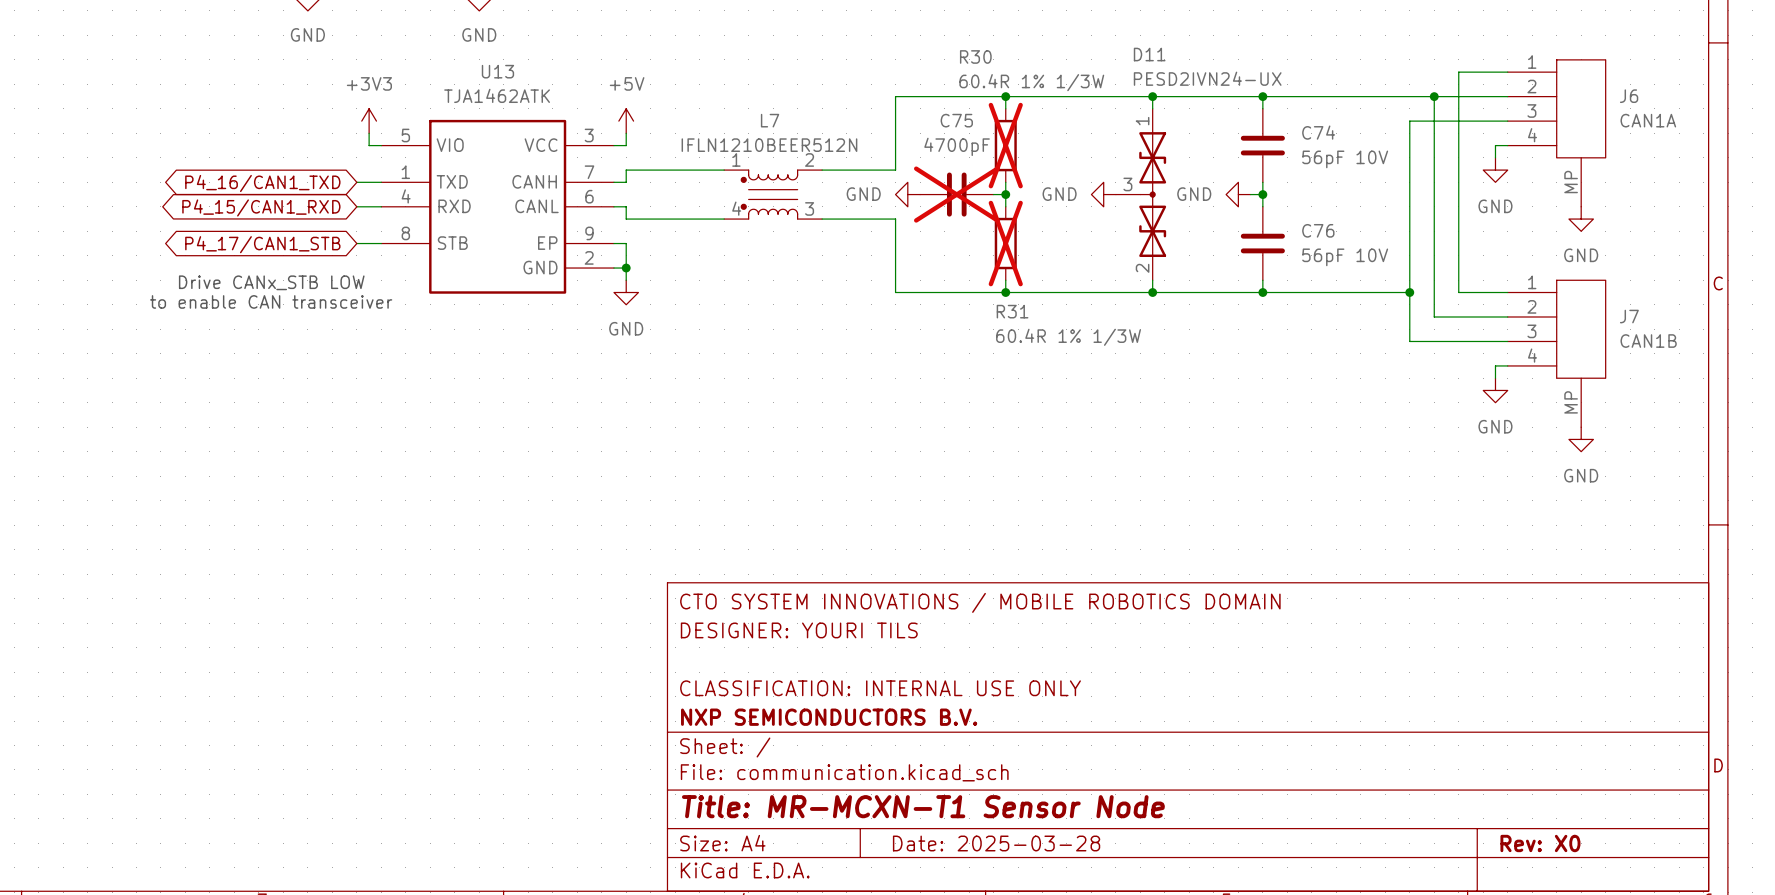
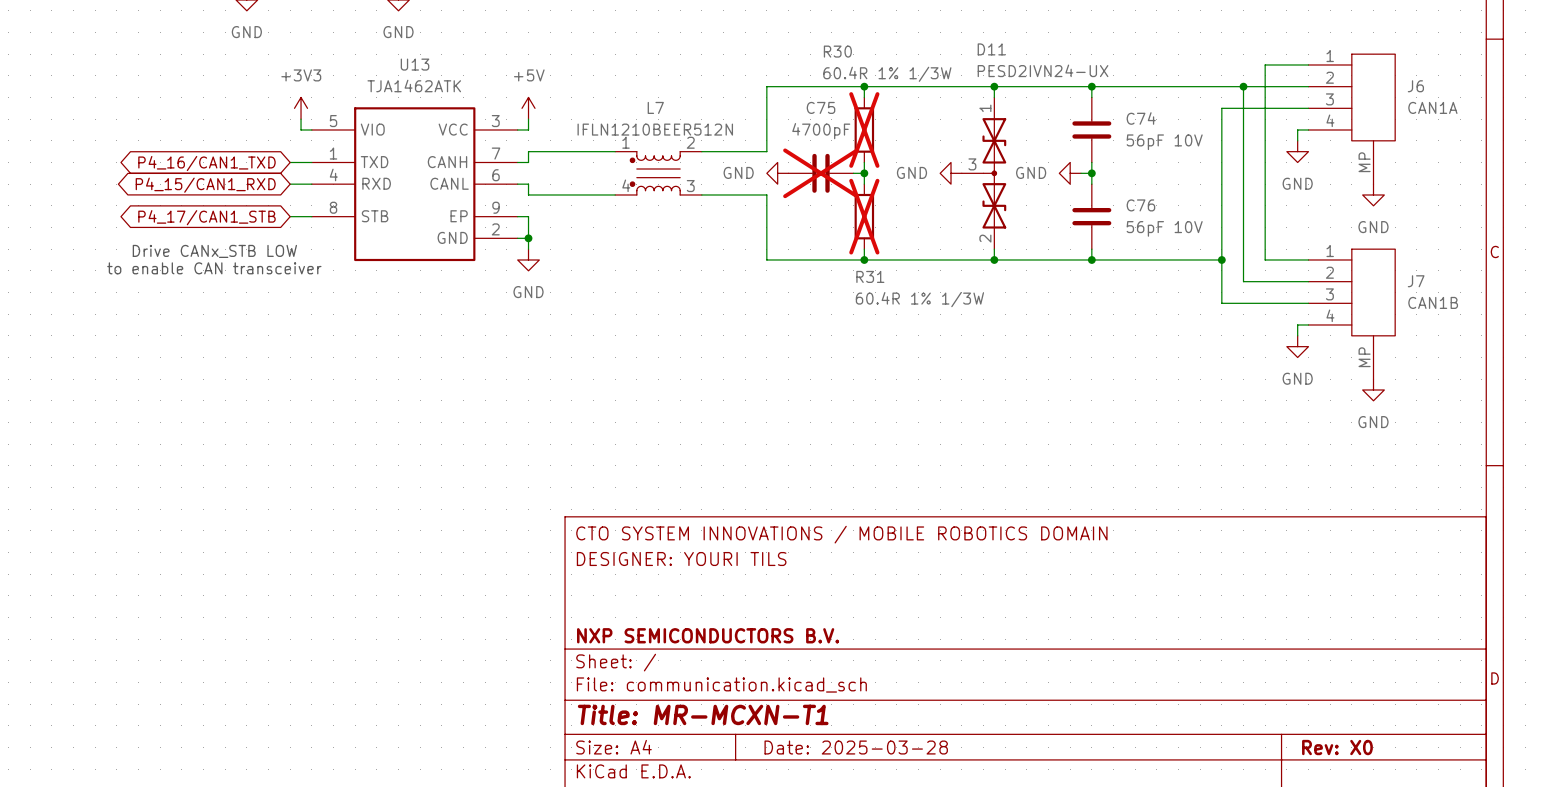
title block: CLASSIFICATION: INTERNAL USE ONLY (880, 688) -> none
title block: Title: MR-MCXN-T1 Sensor Node (923, 806) -> Title: MR-MCXN-T1 (703, 714)

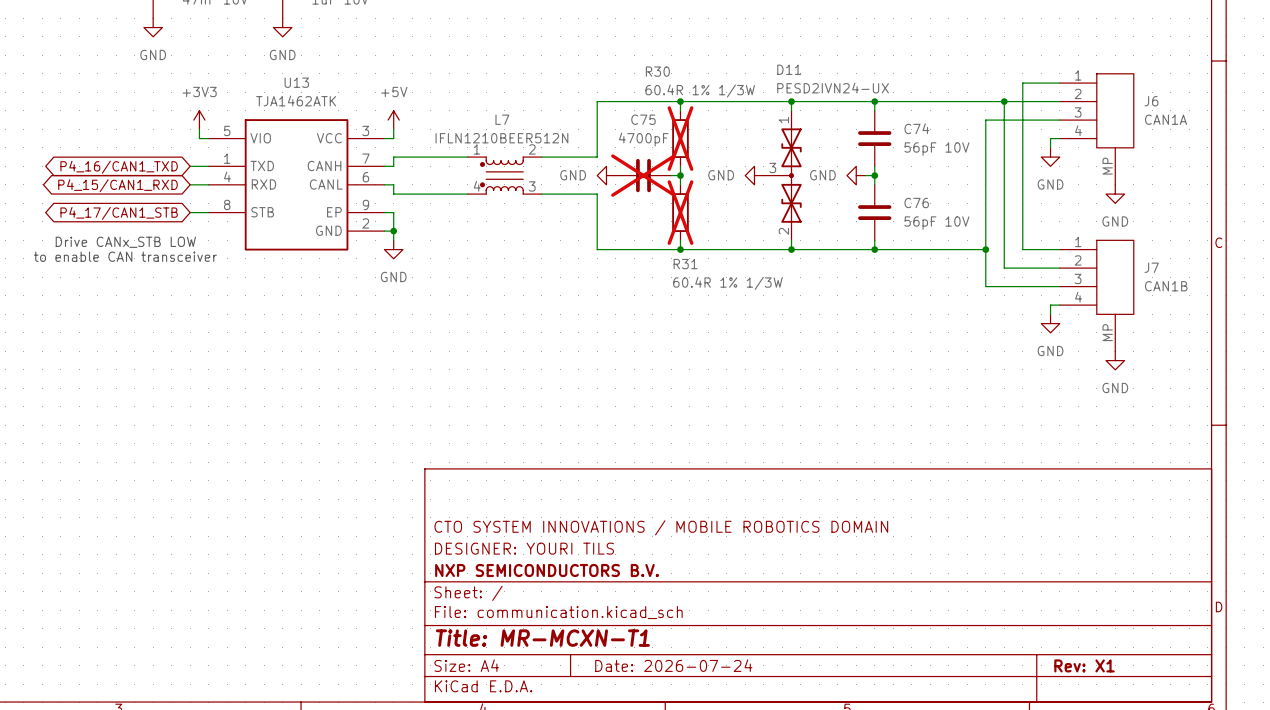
title block position: CTO SYSTEM INNOVATIONS / MOBILE ROBOTICS DOMAIN (841, 534) -> CTO SYSTEM INNOVATIONS / MOBILE ROBOTICS DOMAIN (661, 527)
title block position: DESIGNER: YOURI TILS (681, 559) -> DESIGNER: YOURI TILS (524, 548)
title block: Date: 2025-03-28 (856, 747) -> Date: 2026-07-24 (673, 665)
title block: Rev: X0 (1337, 747) -> Rev: X1 (1084, 665)

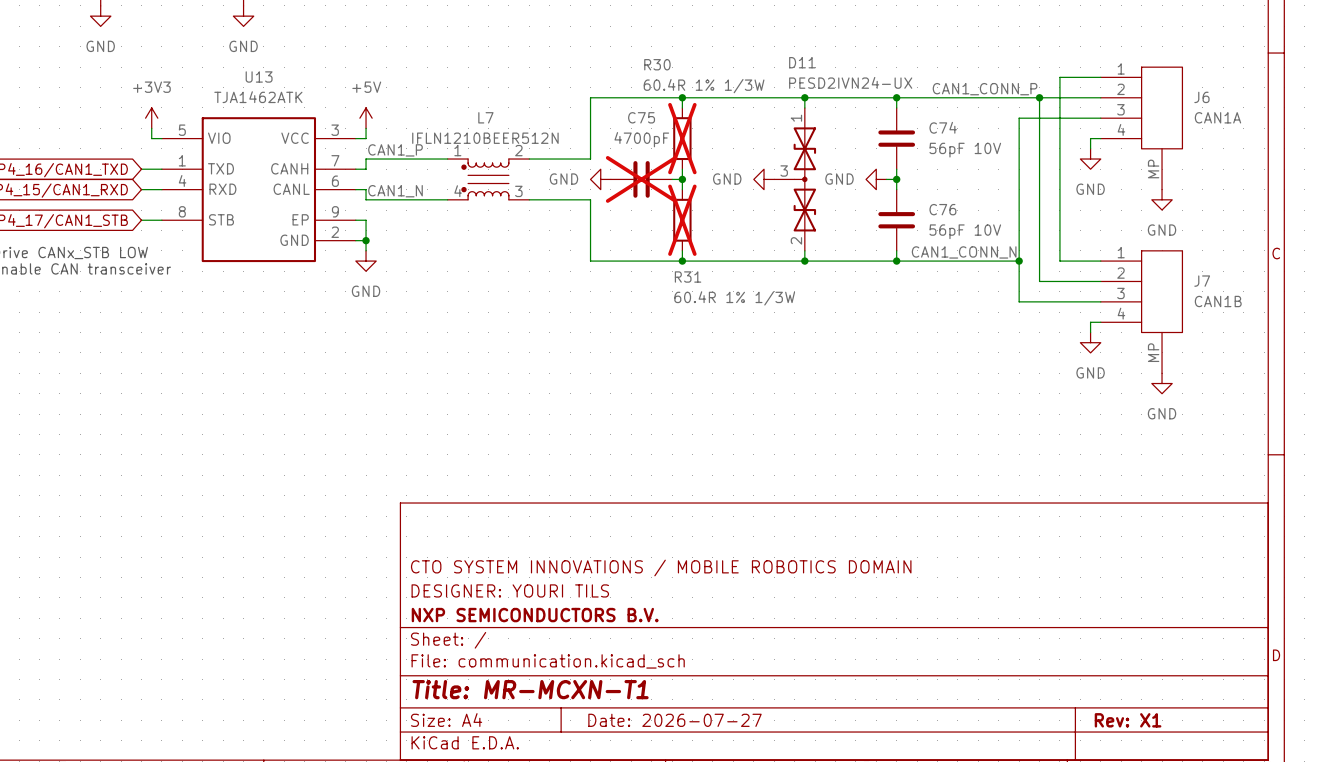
label: none -> CAN1_CONN_P (985, 89)
label: none -> CAN1_P (395, 150)
label: none -> CAN1_N (395, 191)
label: none -> CAN1_CONN_N (964, 252)
title block: Date: 2026-07-24 (673, 665) -> Date: 2026-07-27 (675, 720)

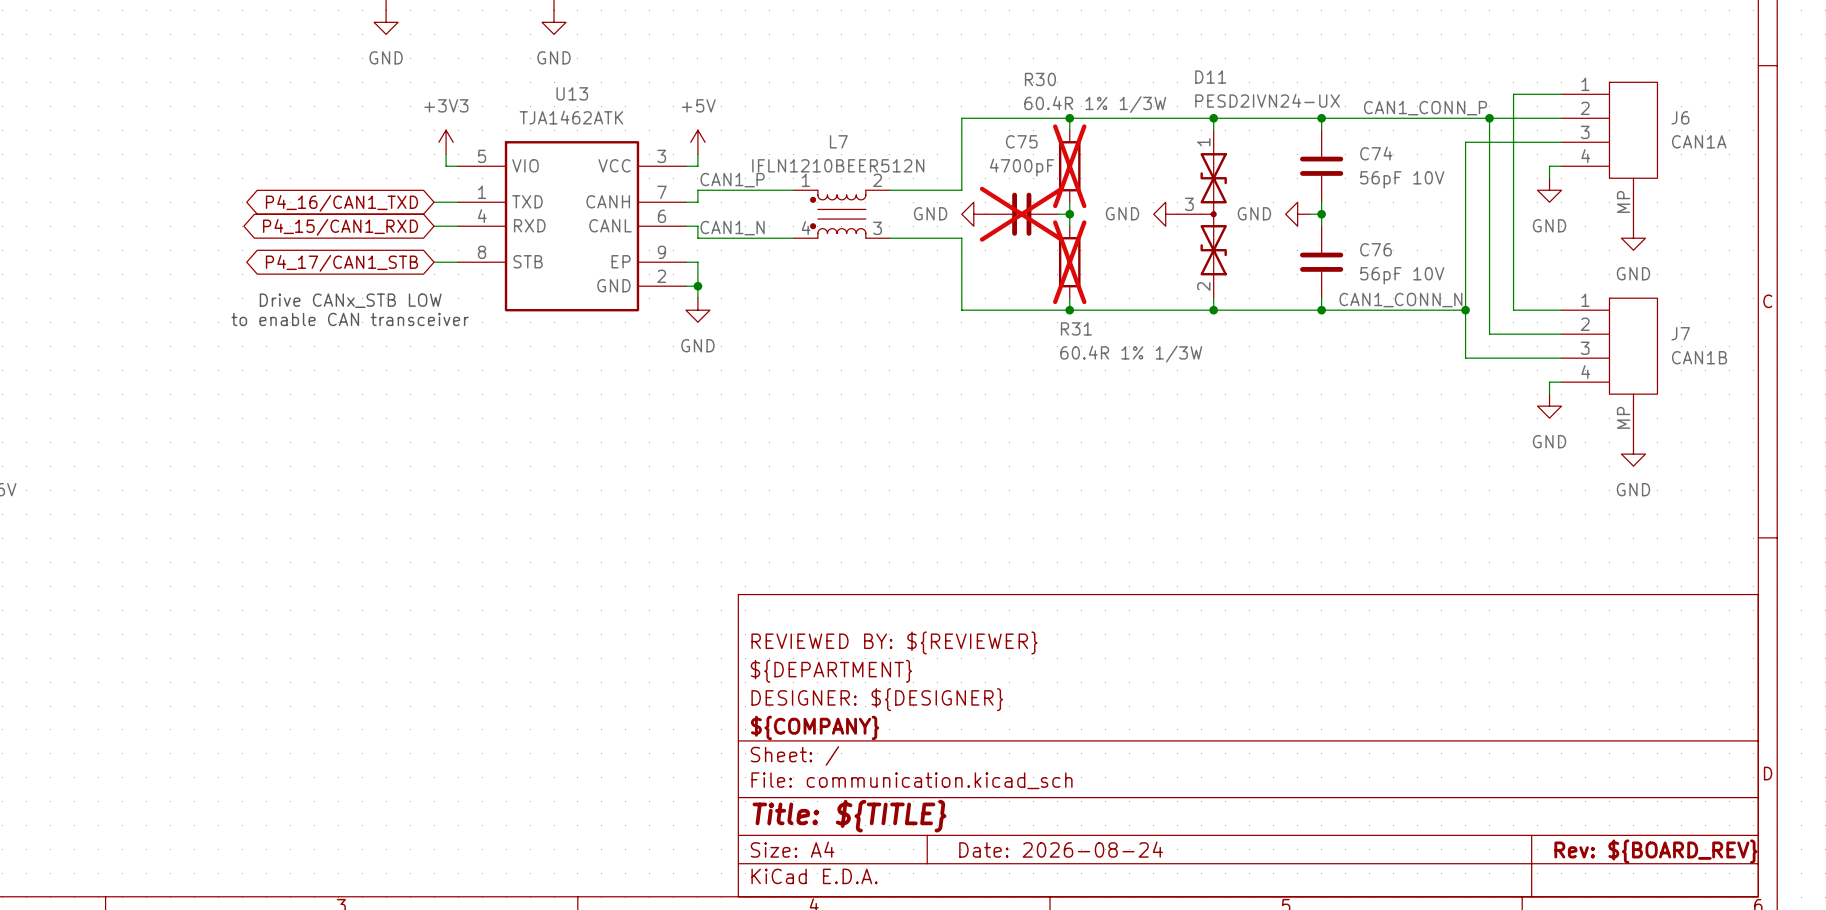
title block: none -> REVIEWED BY: ${REVIEWER} (894, 642)
title block: CTO SYSTEM INNOVATIONS / MOBILE ROBOTICS DOMAIN (661, 567) -> ${DEPARTMENT} (831, 671)
title block: DESIGNER: YOURI TILS (510, 590) -> DESIGNER: ${DESIGNER} (877, 699)
title block: NXP SEMICONDUCTORS B.V. (535, 615) -> ${COMPANY} (815, 727)
title block: Title: MR-MCXN-T1 (530, 689) -> Title: ${TITLE} (849, 816)
title block: Date: 2026-07-27 (675, 720) -> Date: 2026-08-24 (1061, 849)
title block: Rev: X1 (1128, 720) -> Rev: ${BOARD_REV} (1655, 851)

